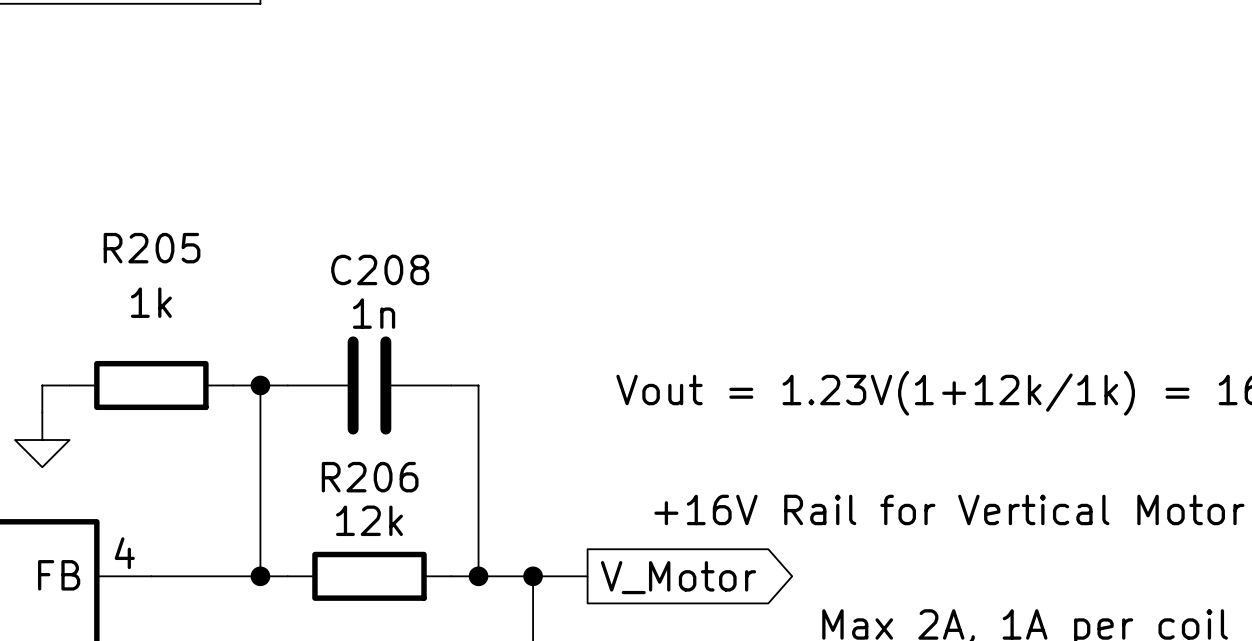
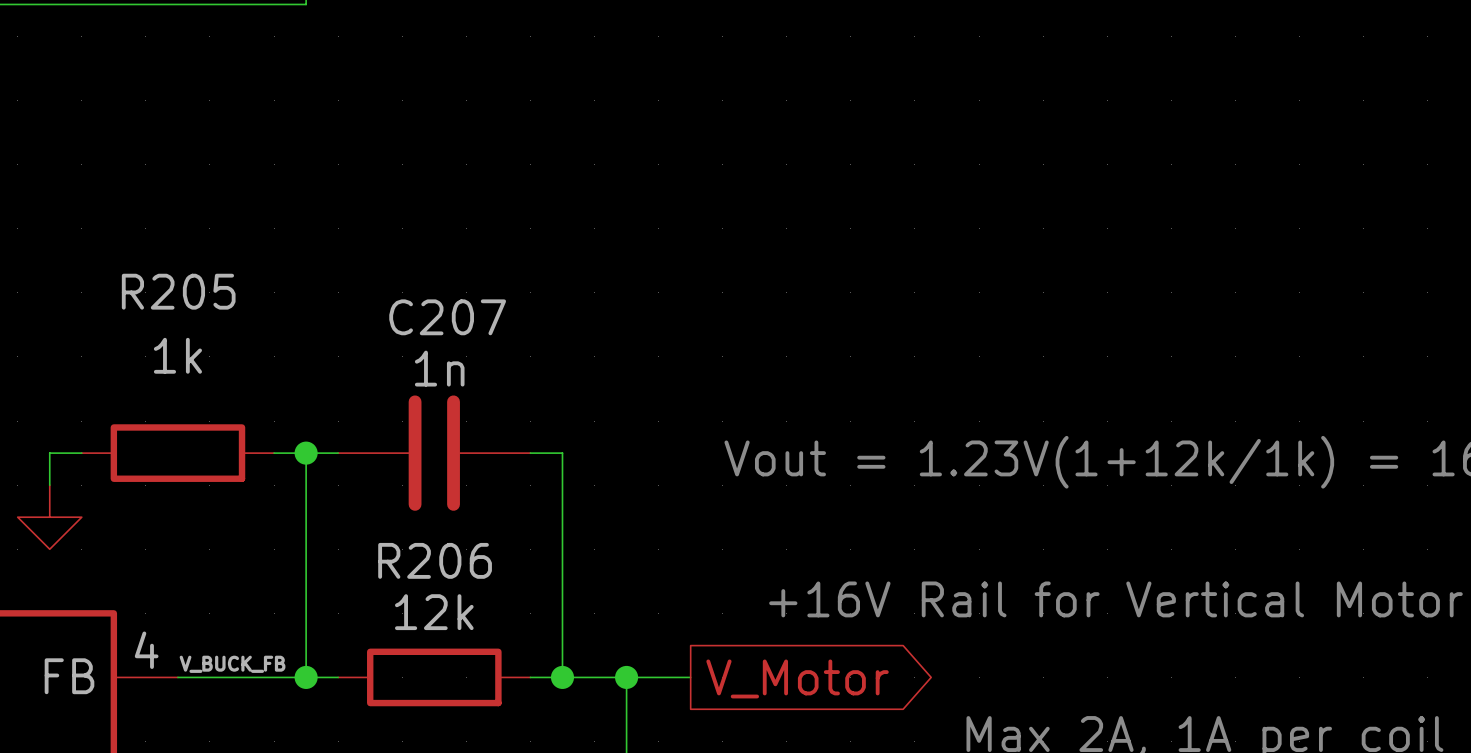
C208 name: C208 (380, 269) -> C207 (447, 317)
label: none -> V_BUCK_FB (232, 664)

